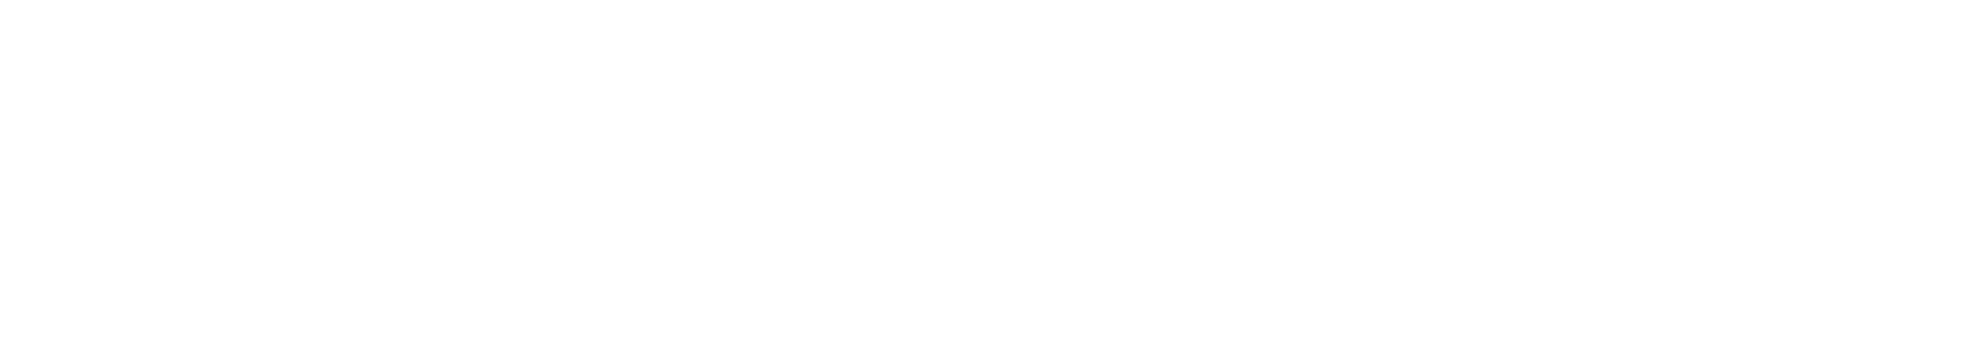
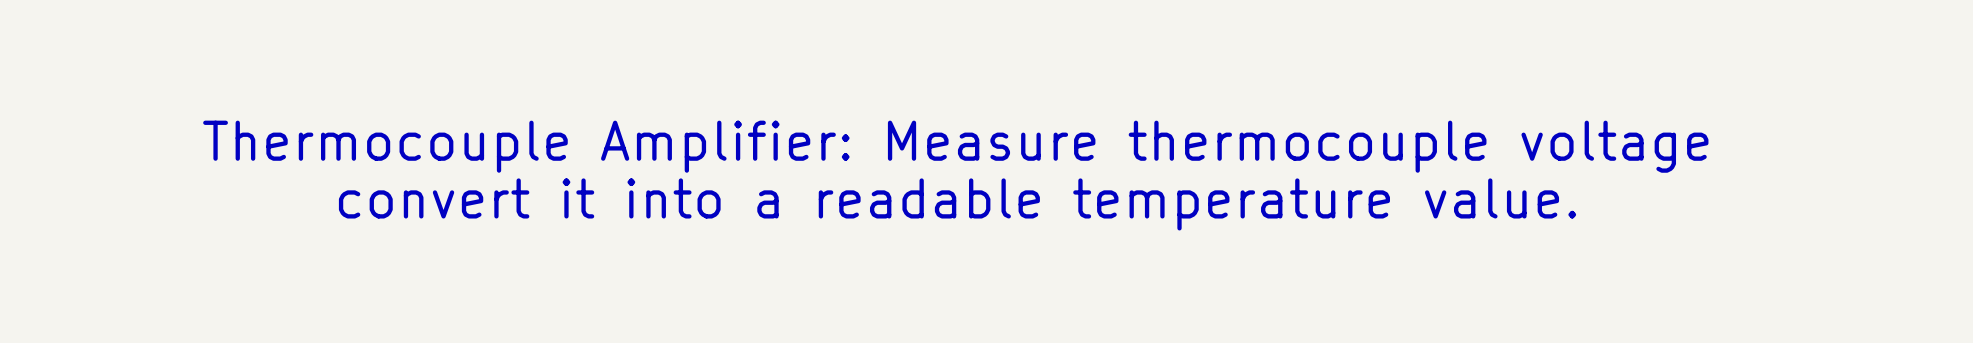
text: none -> Thermocouple Amplifier: Measure thermocouple voltage (955, 146)
text: none -> convert it into a readable temperature value. (957, 204)

